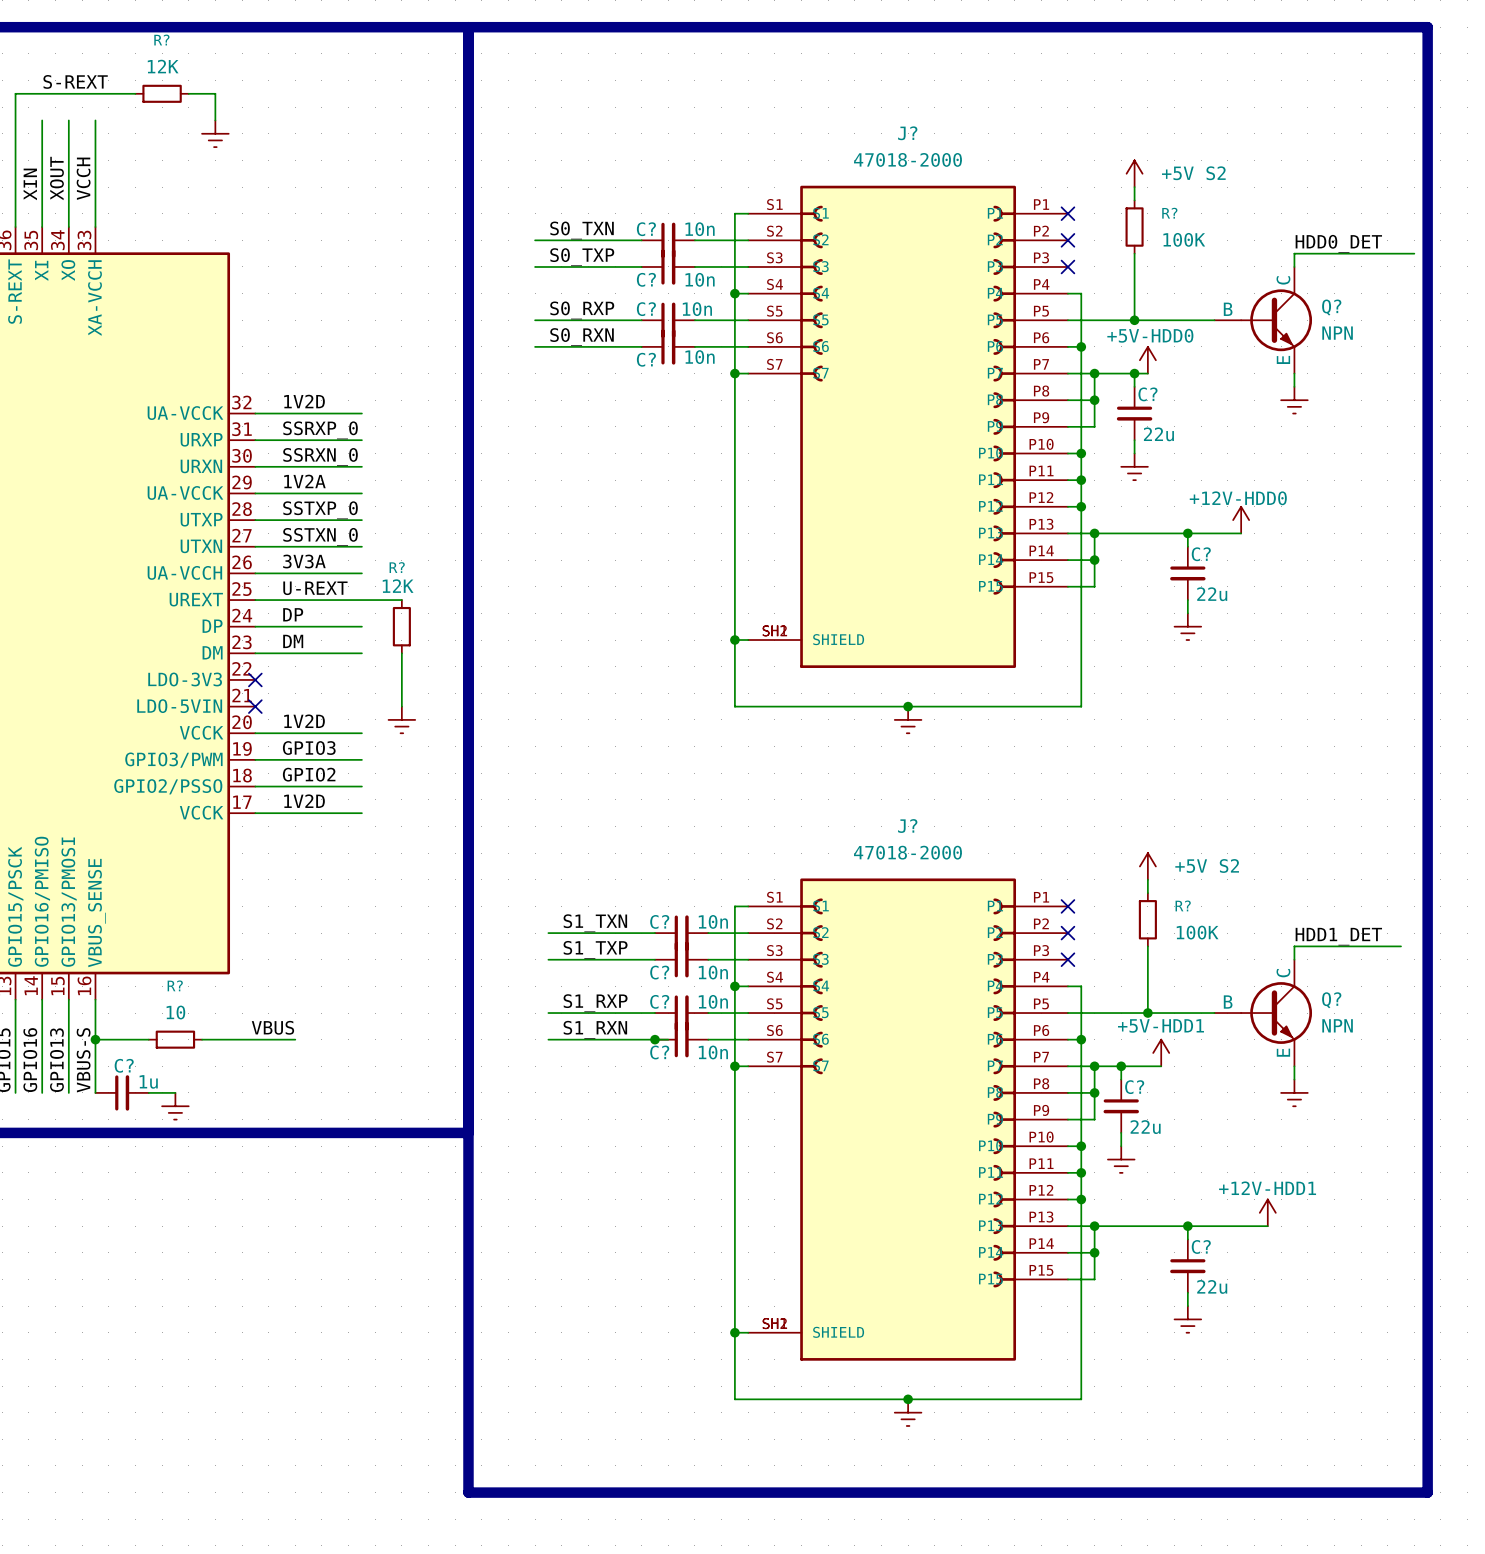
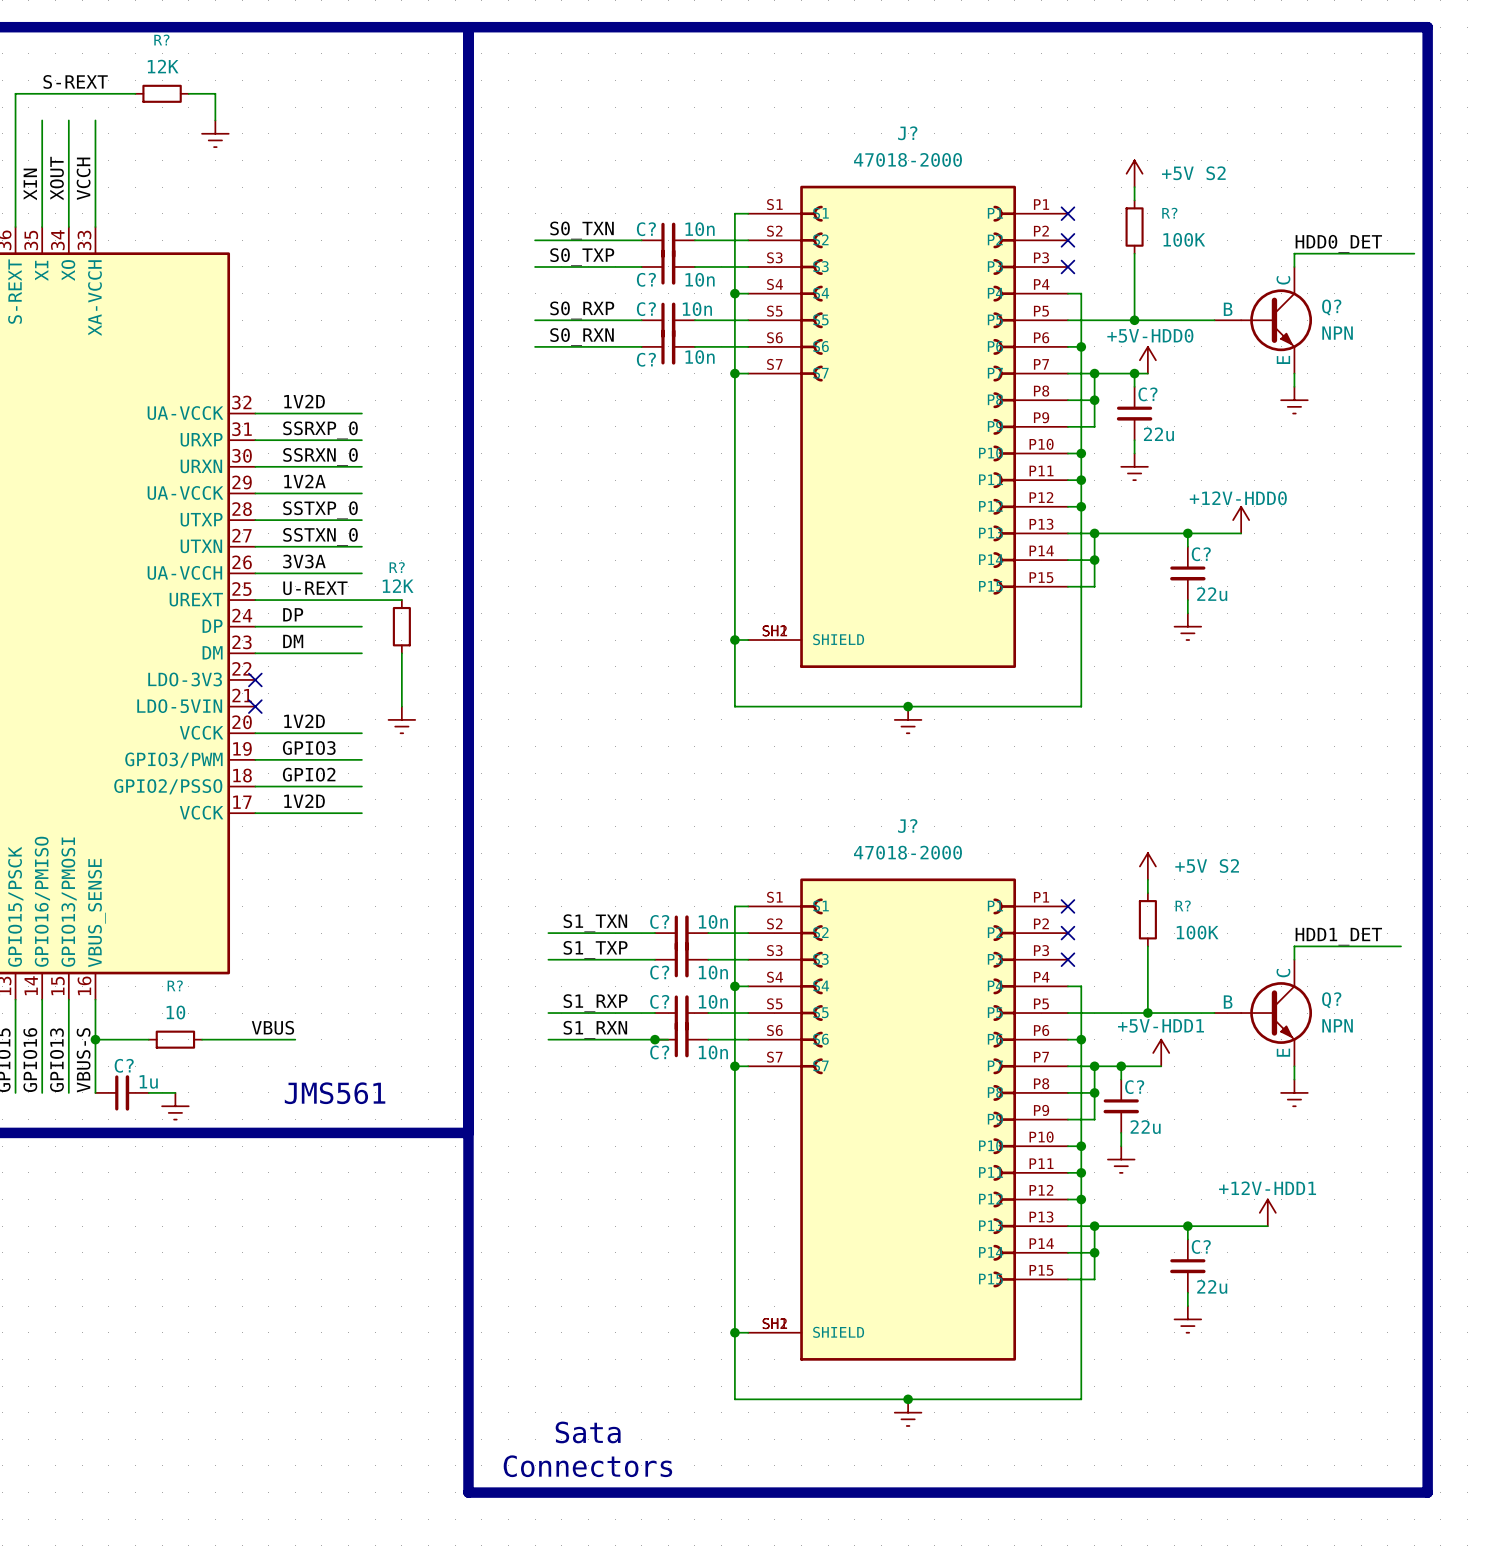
text: none -> JMS561 (335, 1093)
text: none -> Sata (588, 1432)
text: none -> Connectors (587, 1466)

